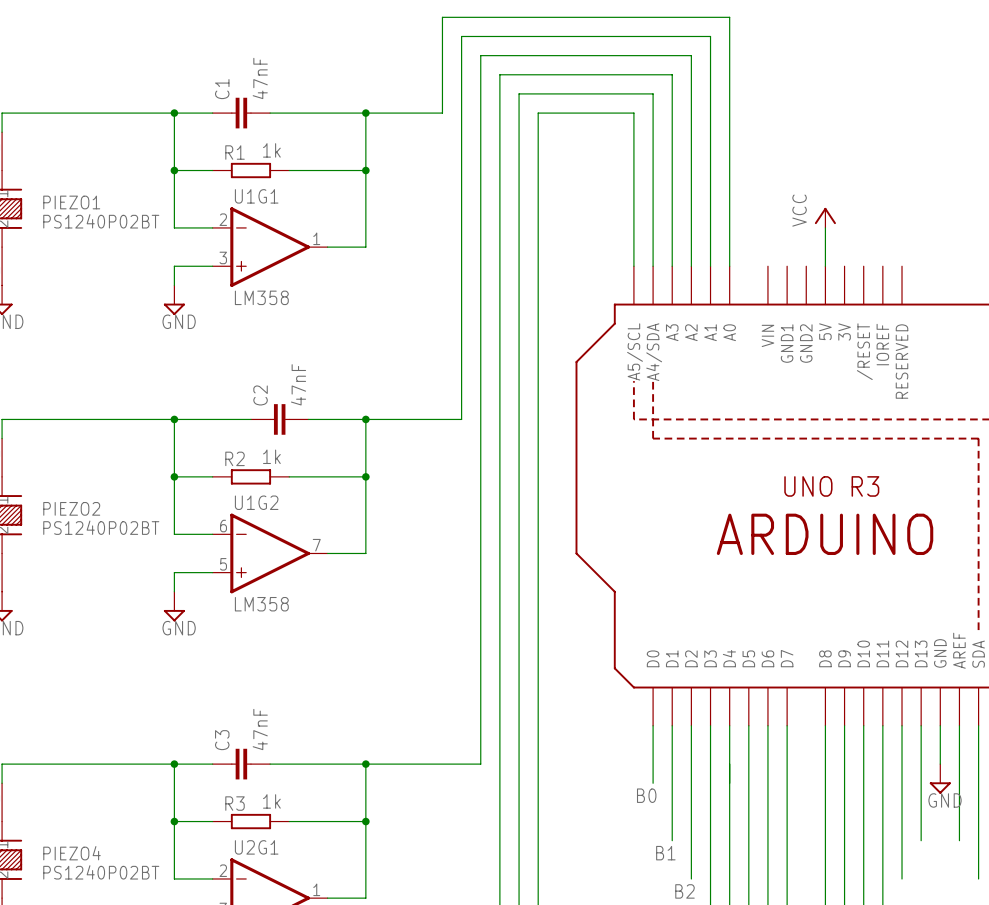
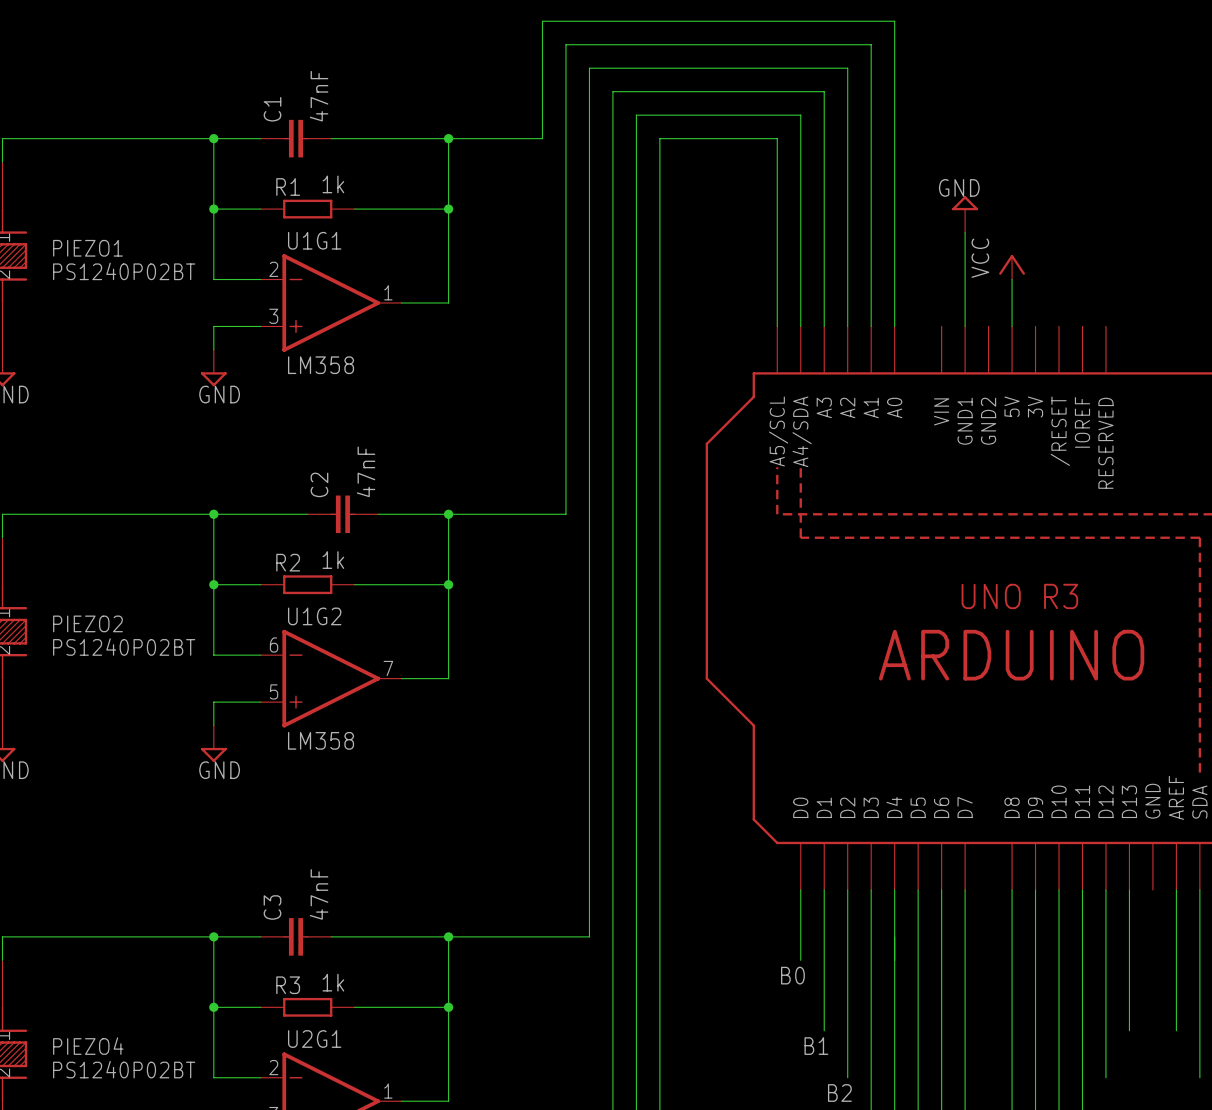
power symbol: none -> GND (965, 214)
wire: none -> (965, 232) (965, 326)
wire: (940, 725) (940, 764) -> none
power symbol: GND (940, 778) -> none

